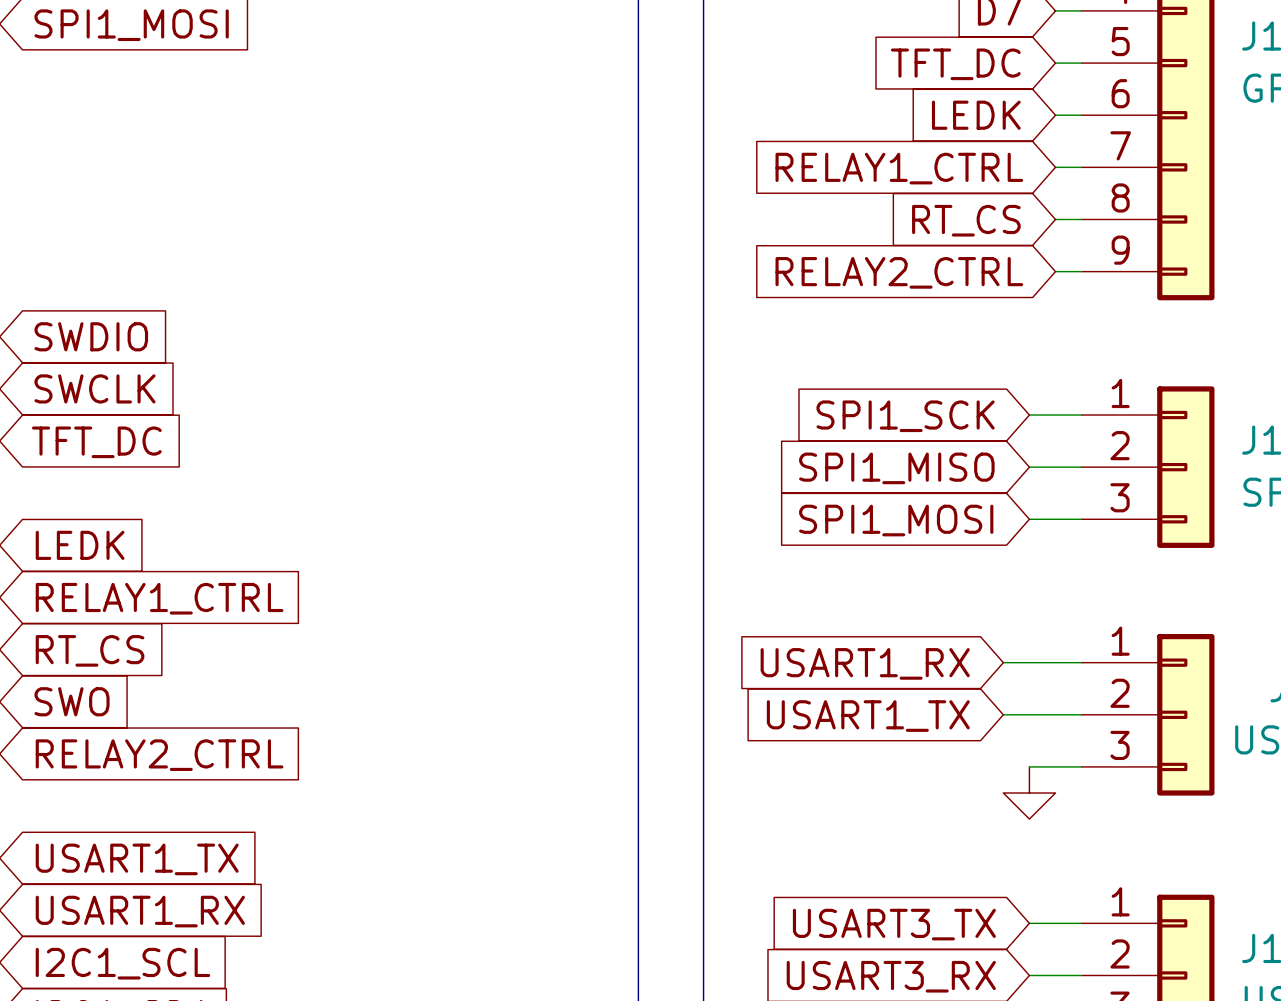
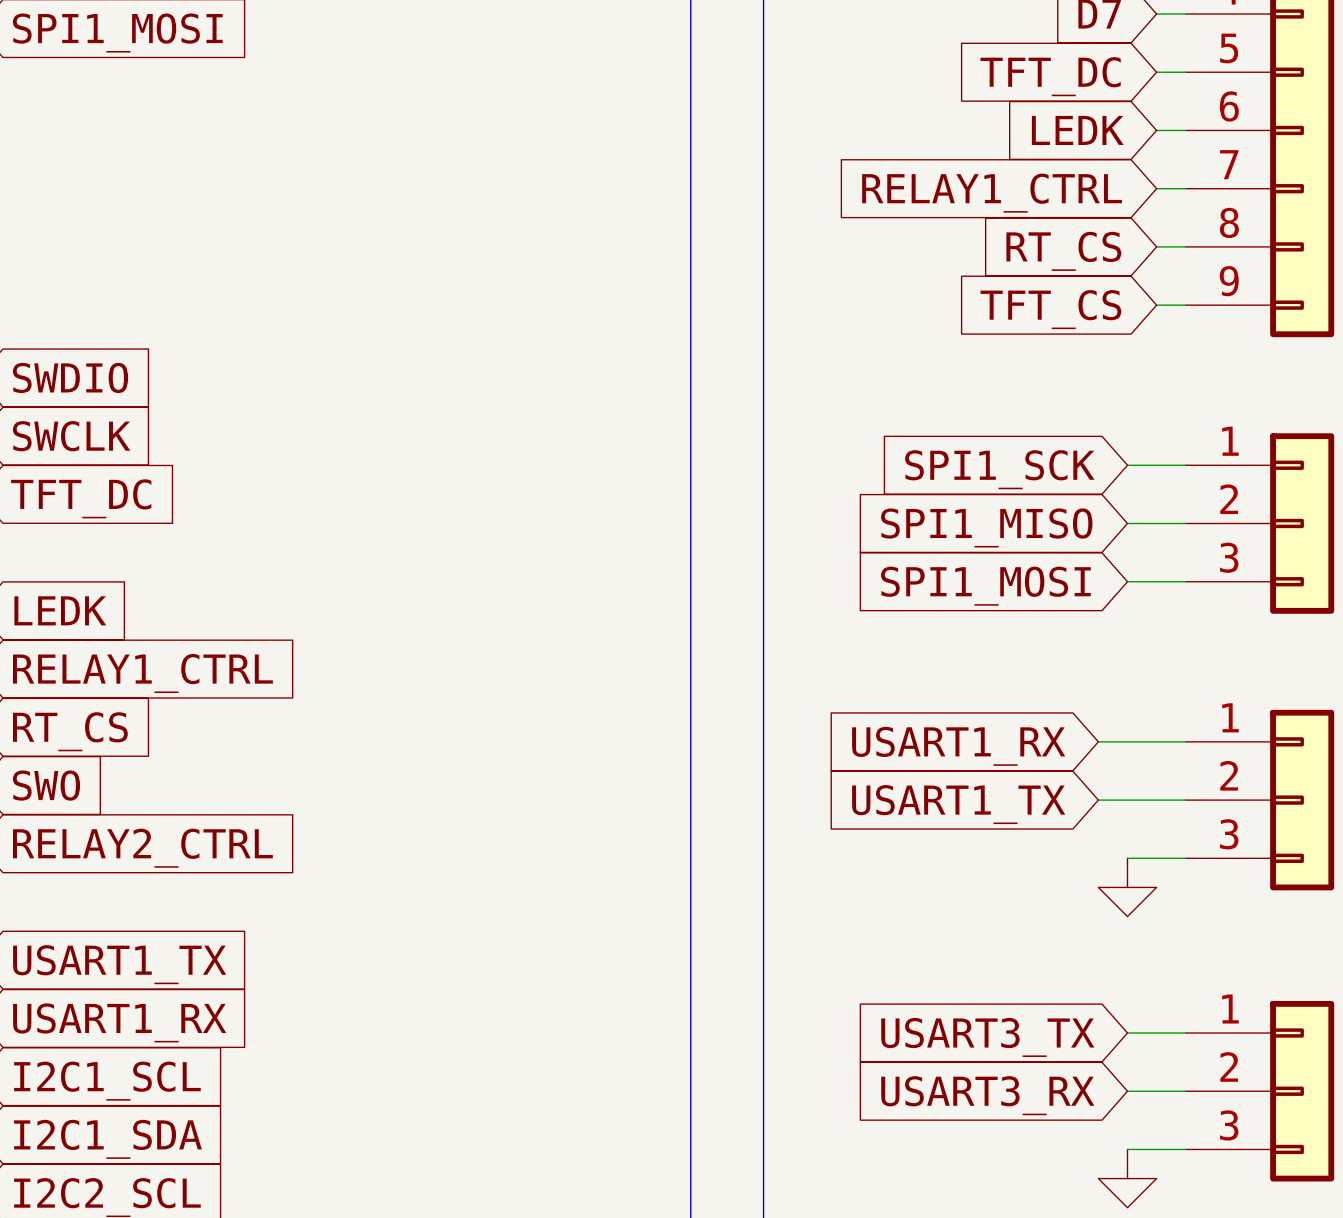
global label: RELAY2_CTRL (899, 272) -> TFT_CS (1050, 309)

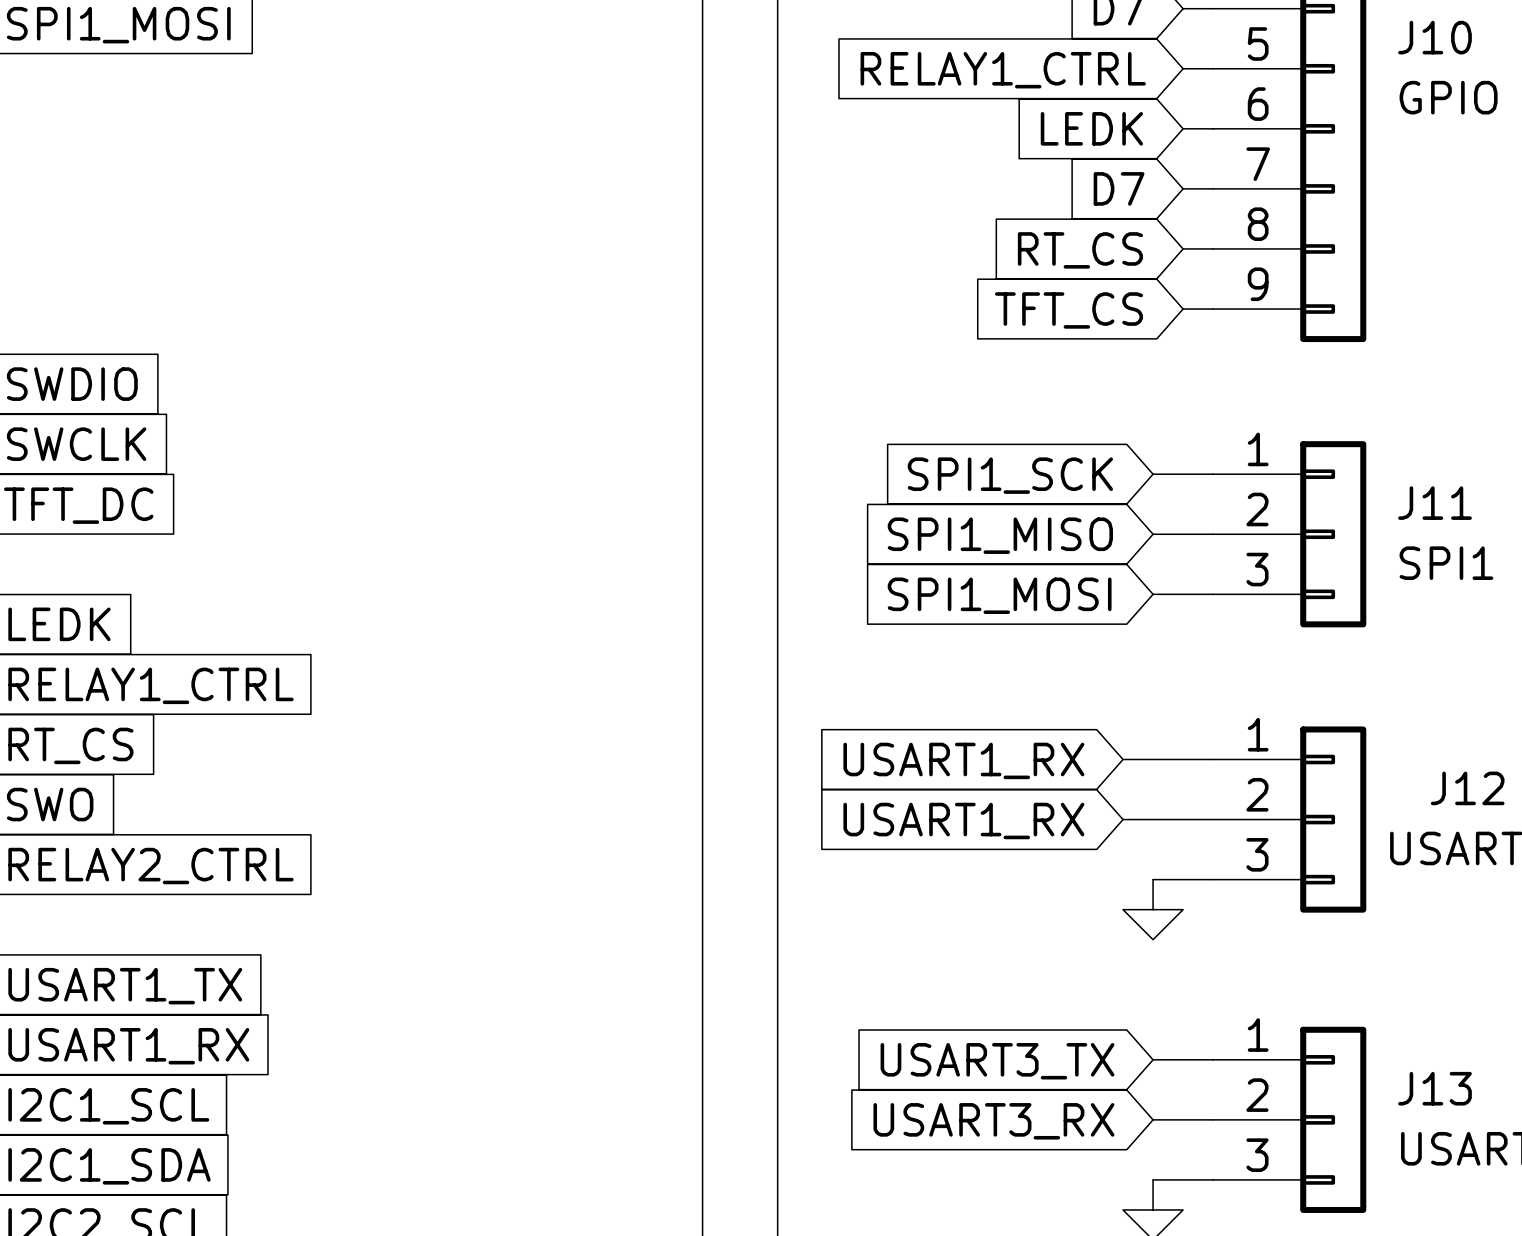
global label: TFT_DC (1050, 76) -> RELAY1_CTRL (1003, 70)
global label: RELAY1_CTRL (992, 193) -> D7 (1119, 188)
global label: USART1_TX (958, 804) -> USART1_RX (963, 820)

